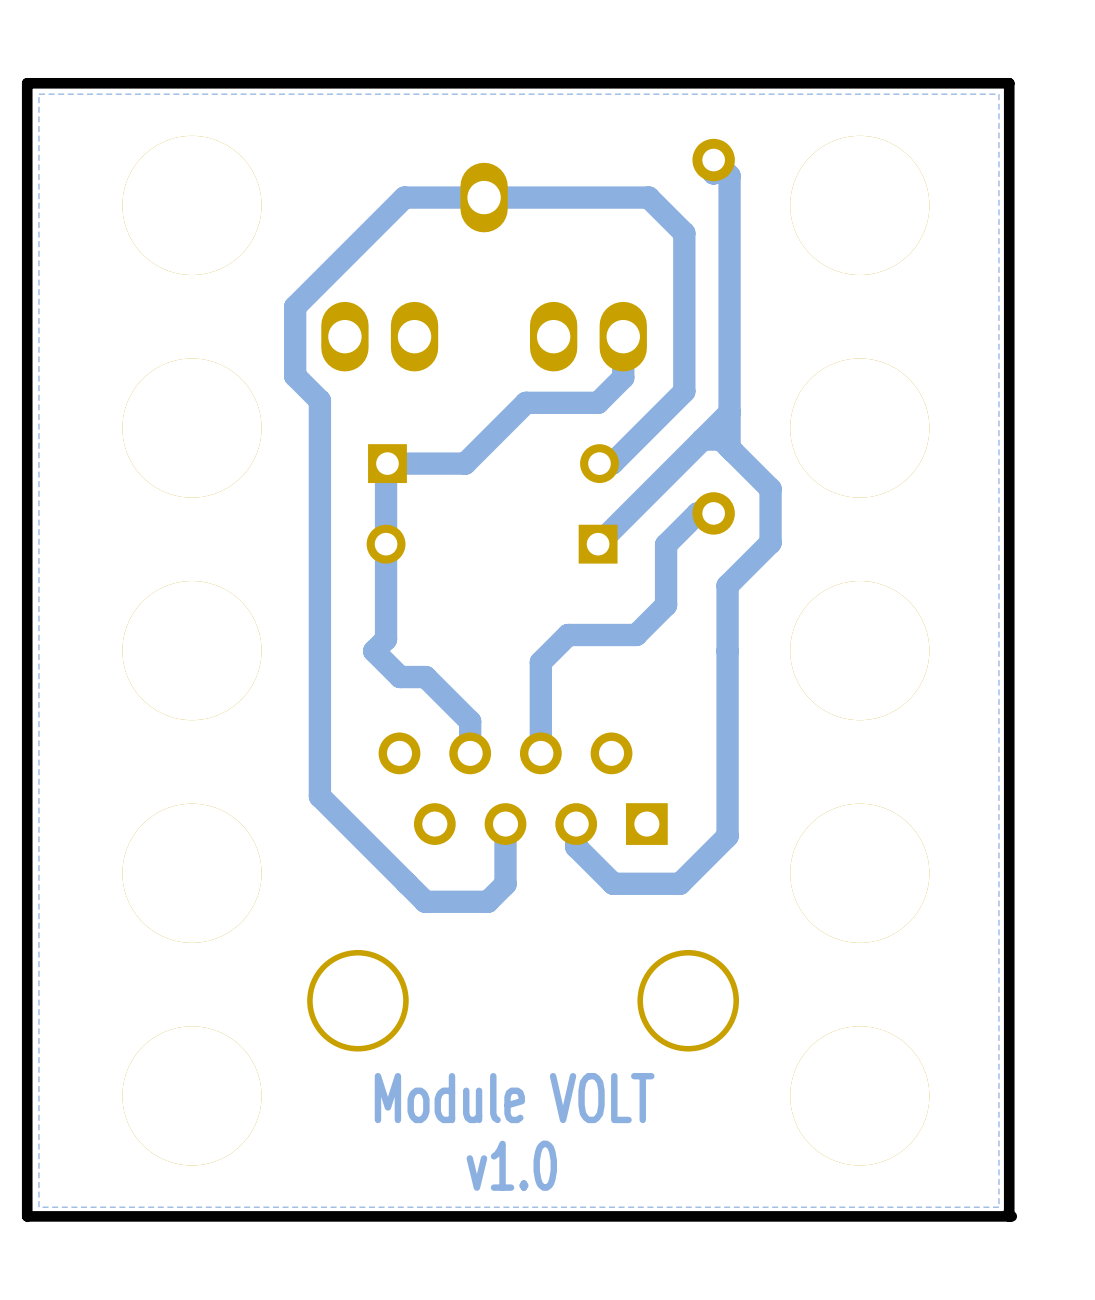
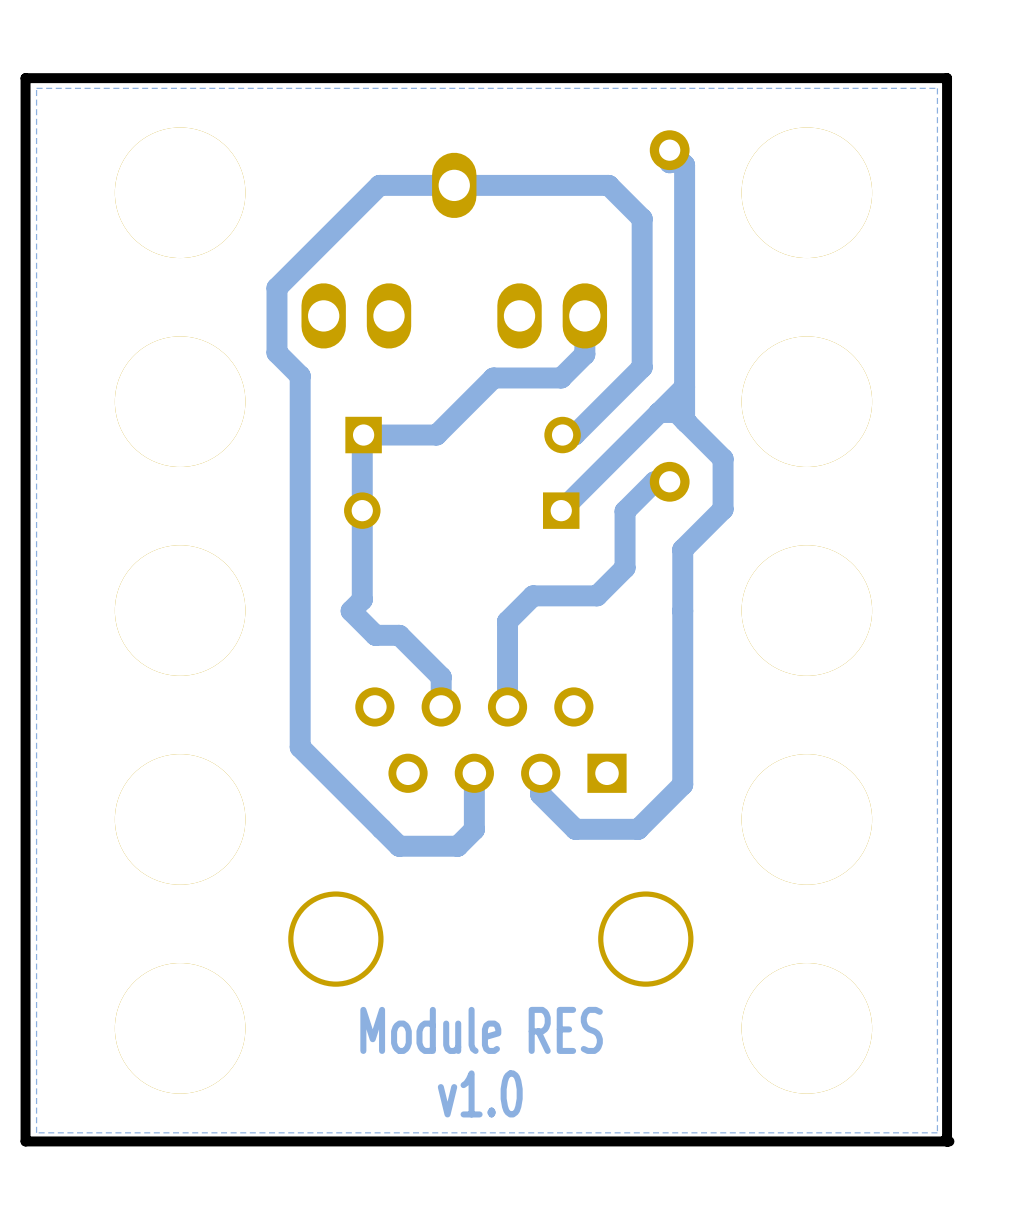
text: Module VOLT (514, 1098) -> Module RES (481, 1030)

